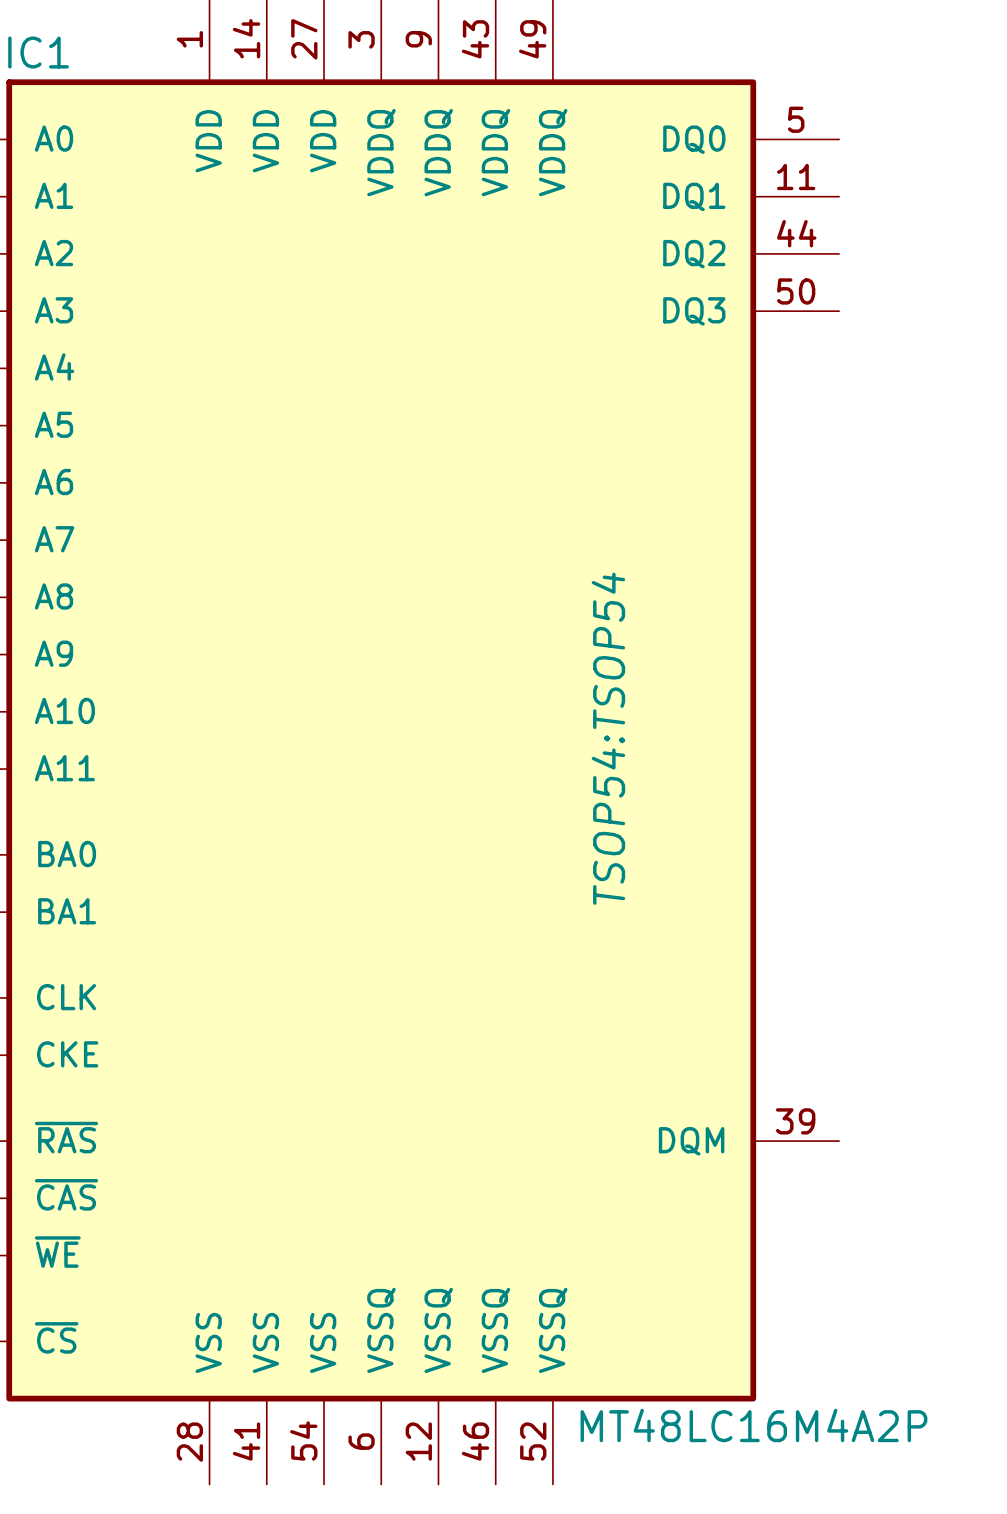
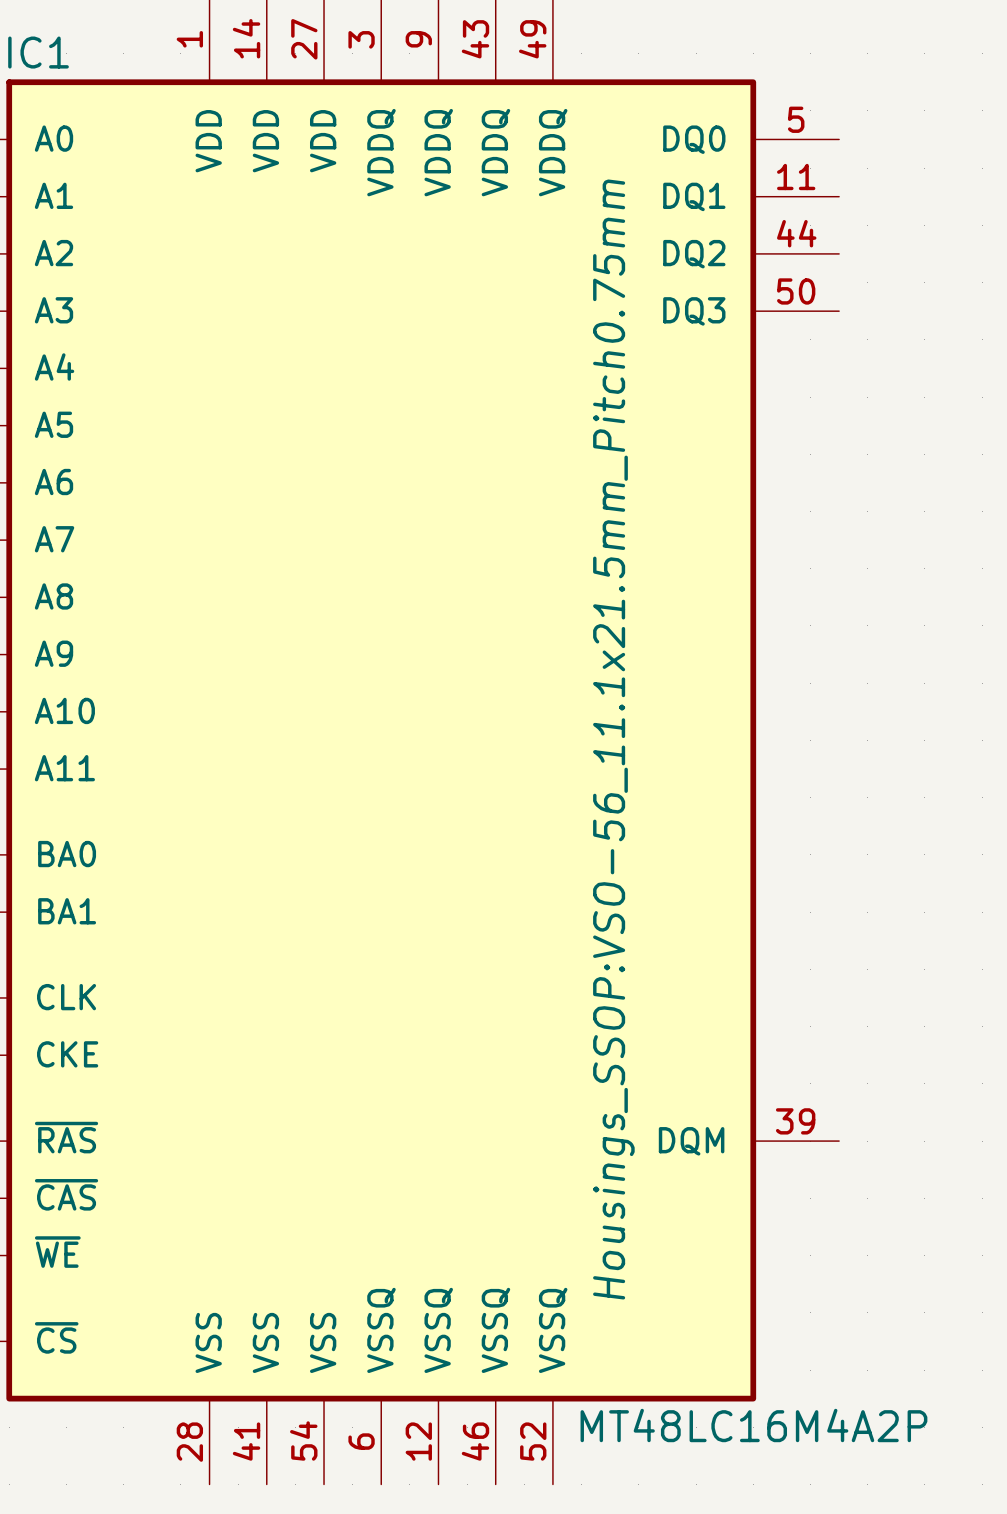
IC1 text: TSOP54:TSOP54 (608, 738) -> Housings_SSOP:VSO-56_11.1x21.5mm_Pitch0.75mm (613, 739)

